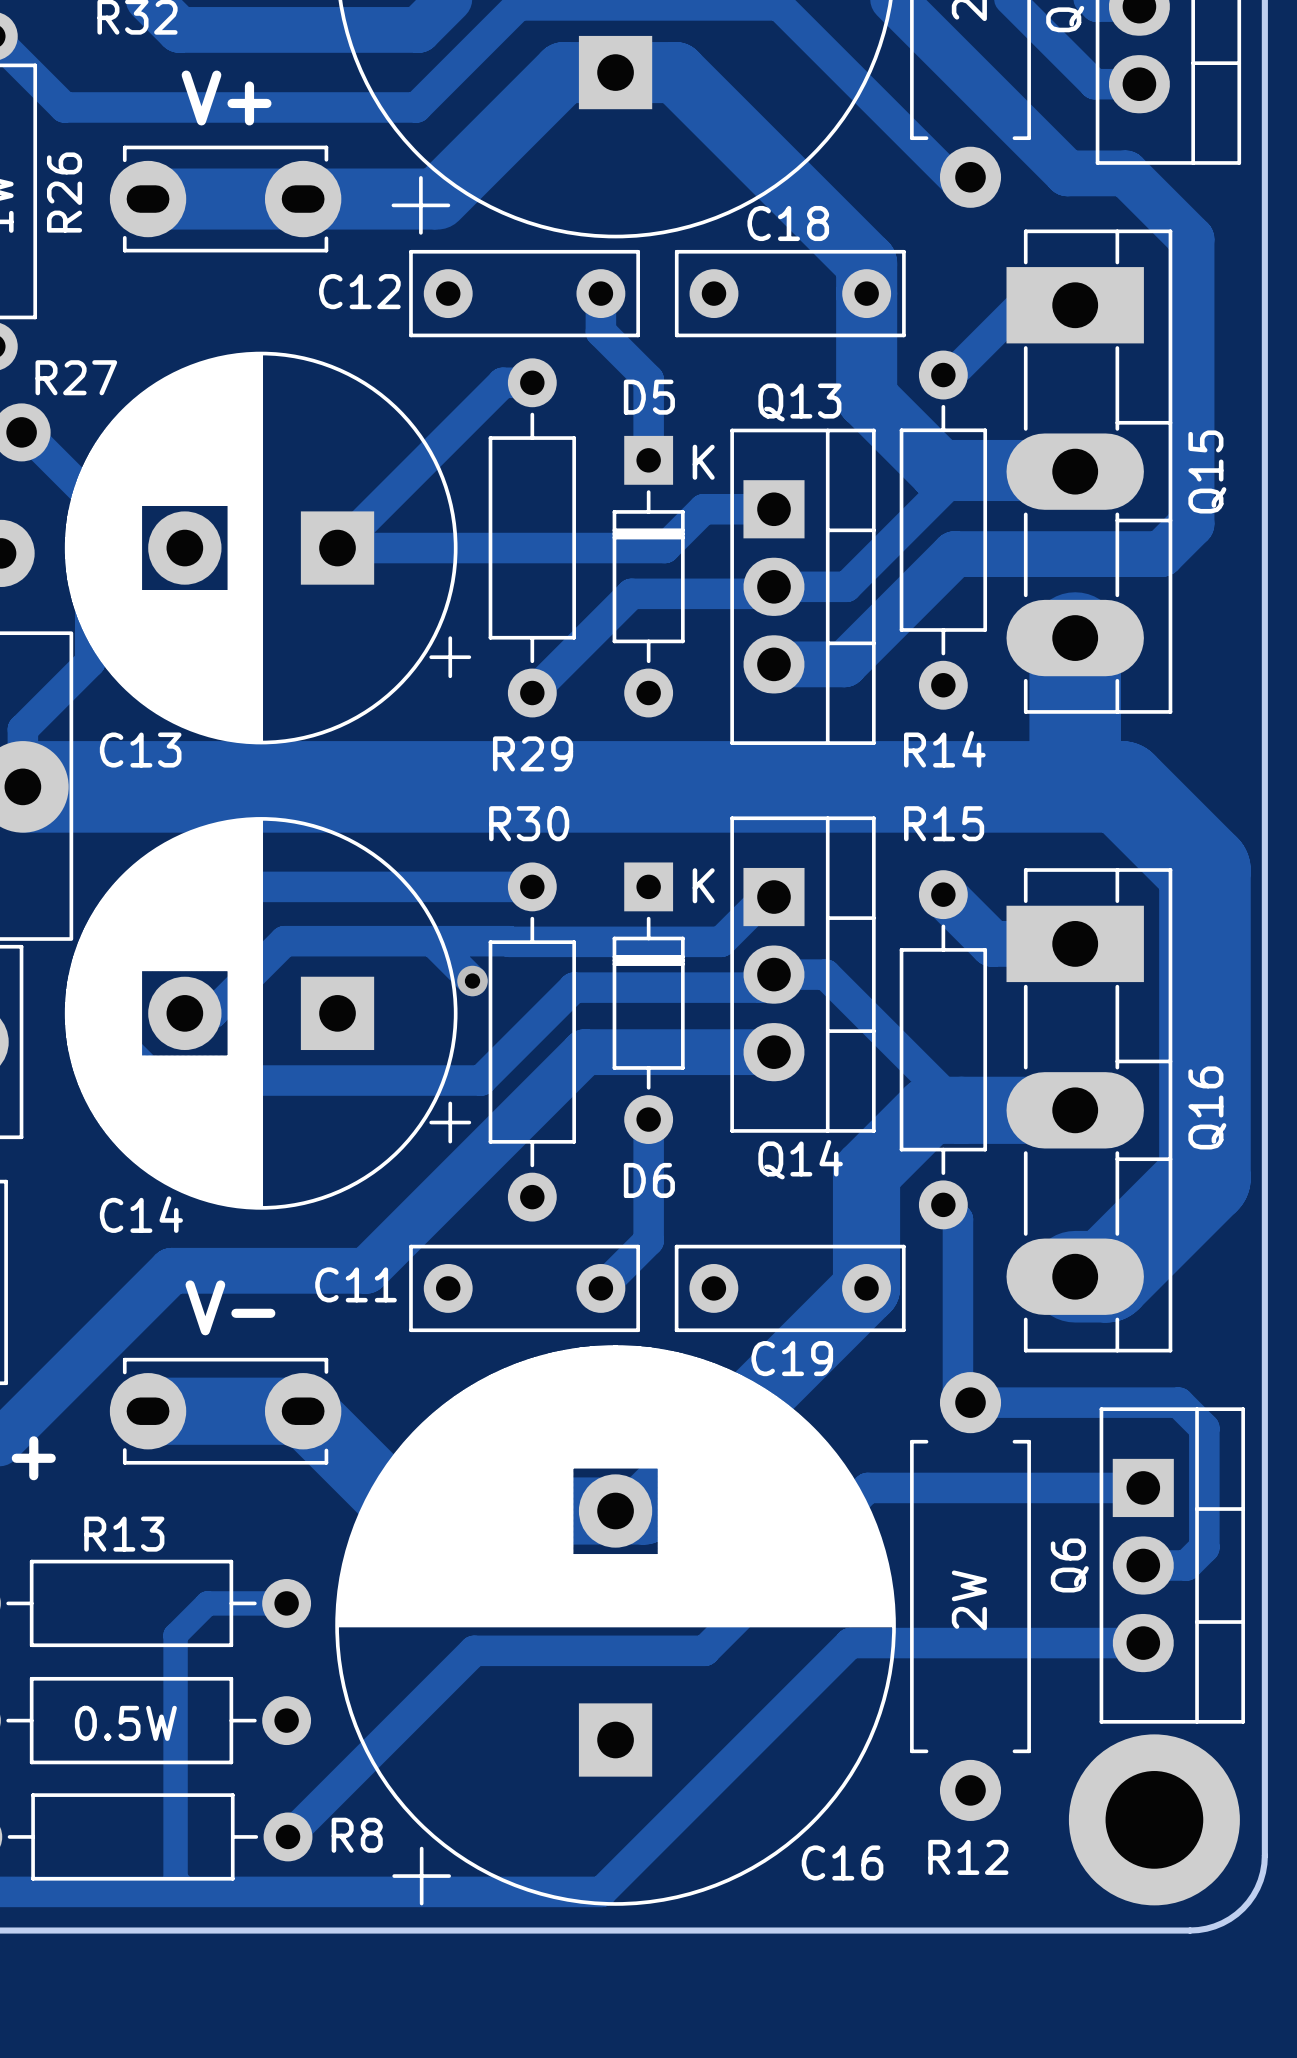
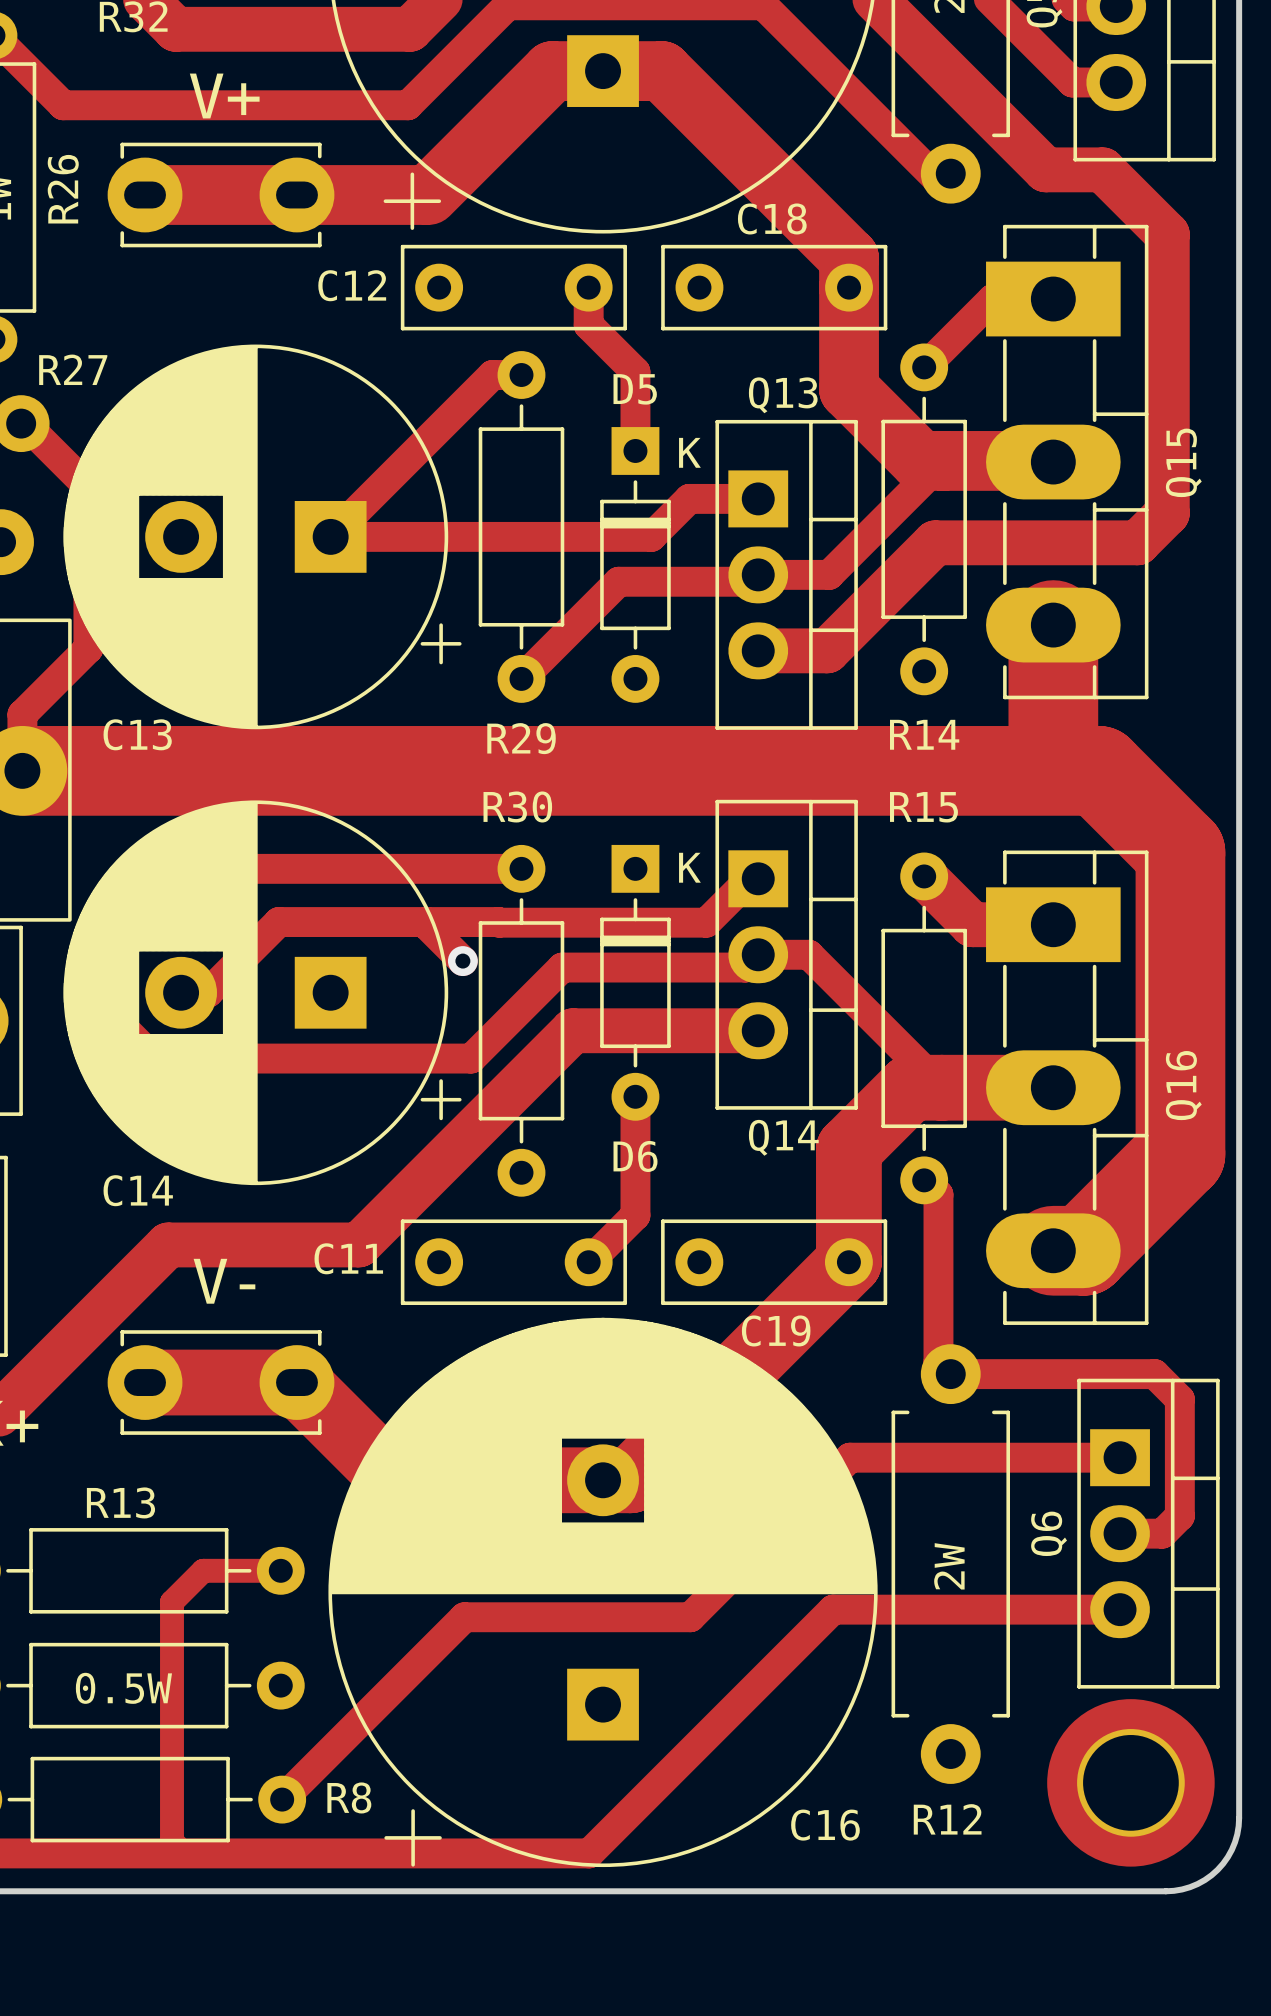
track: (1020, 305) (958, 367) -> (1000, 299) (992, 299) (924, 367)

